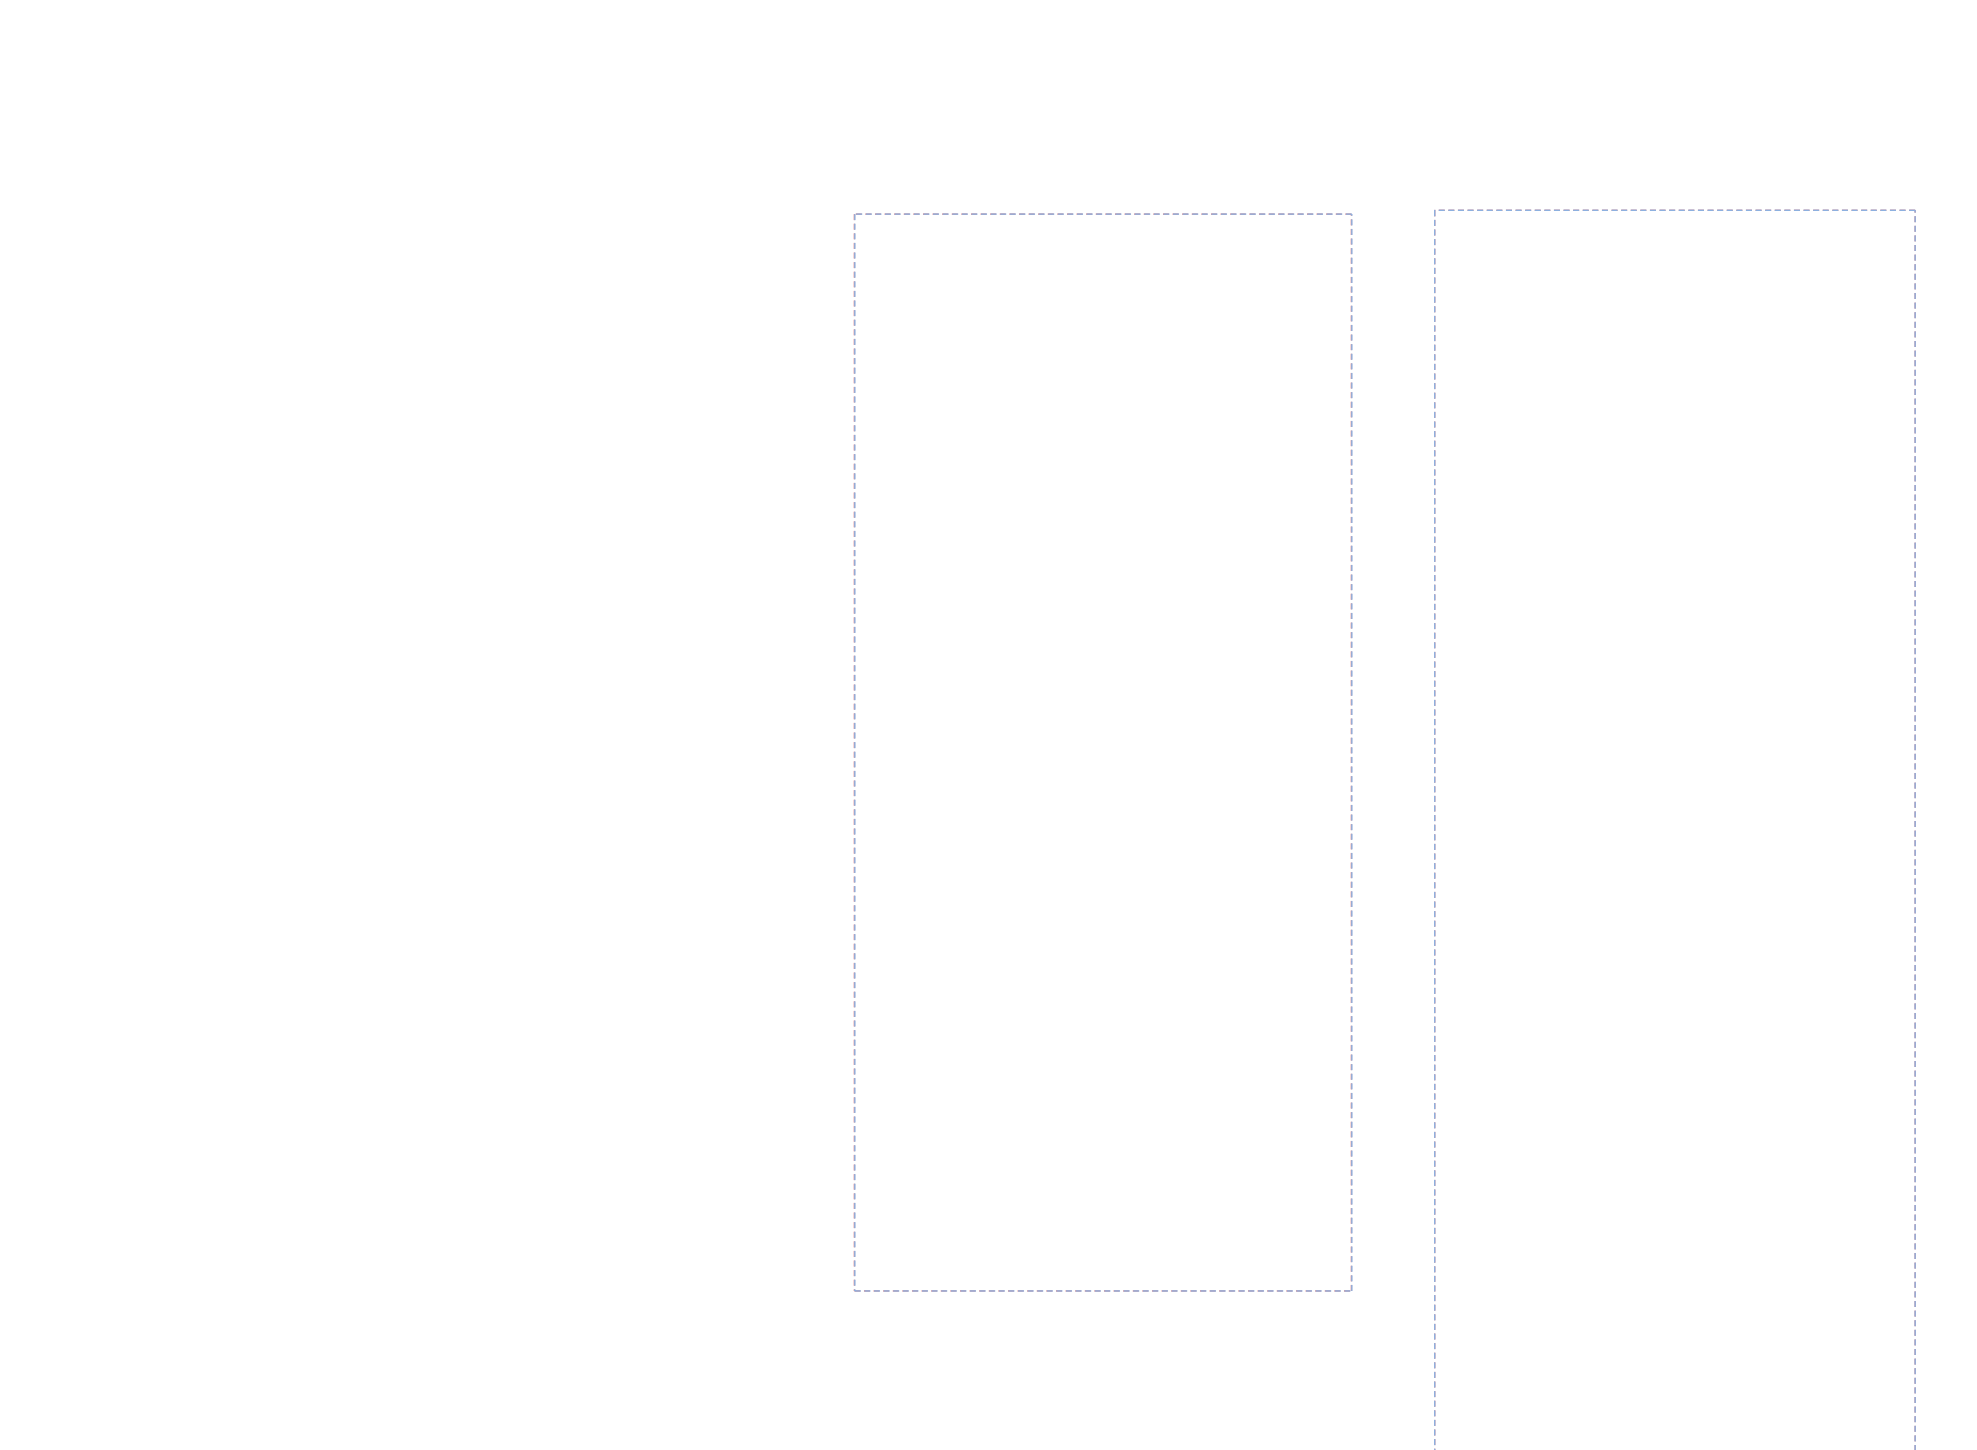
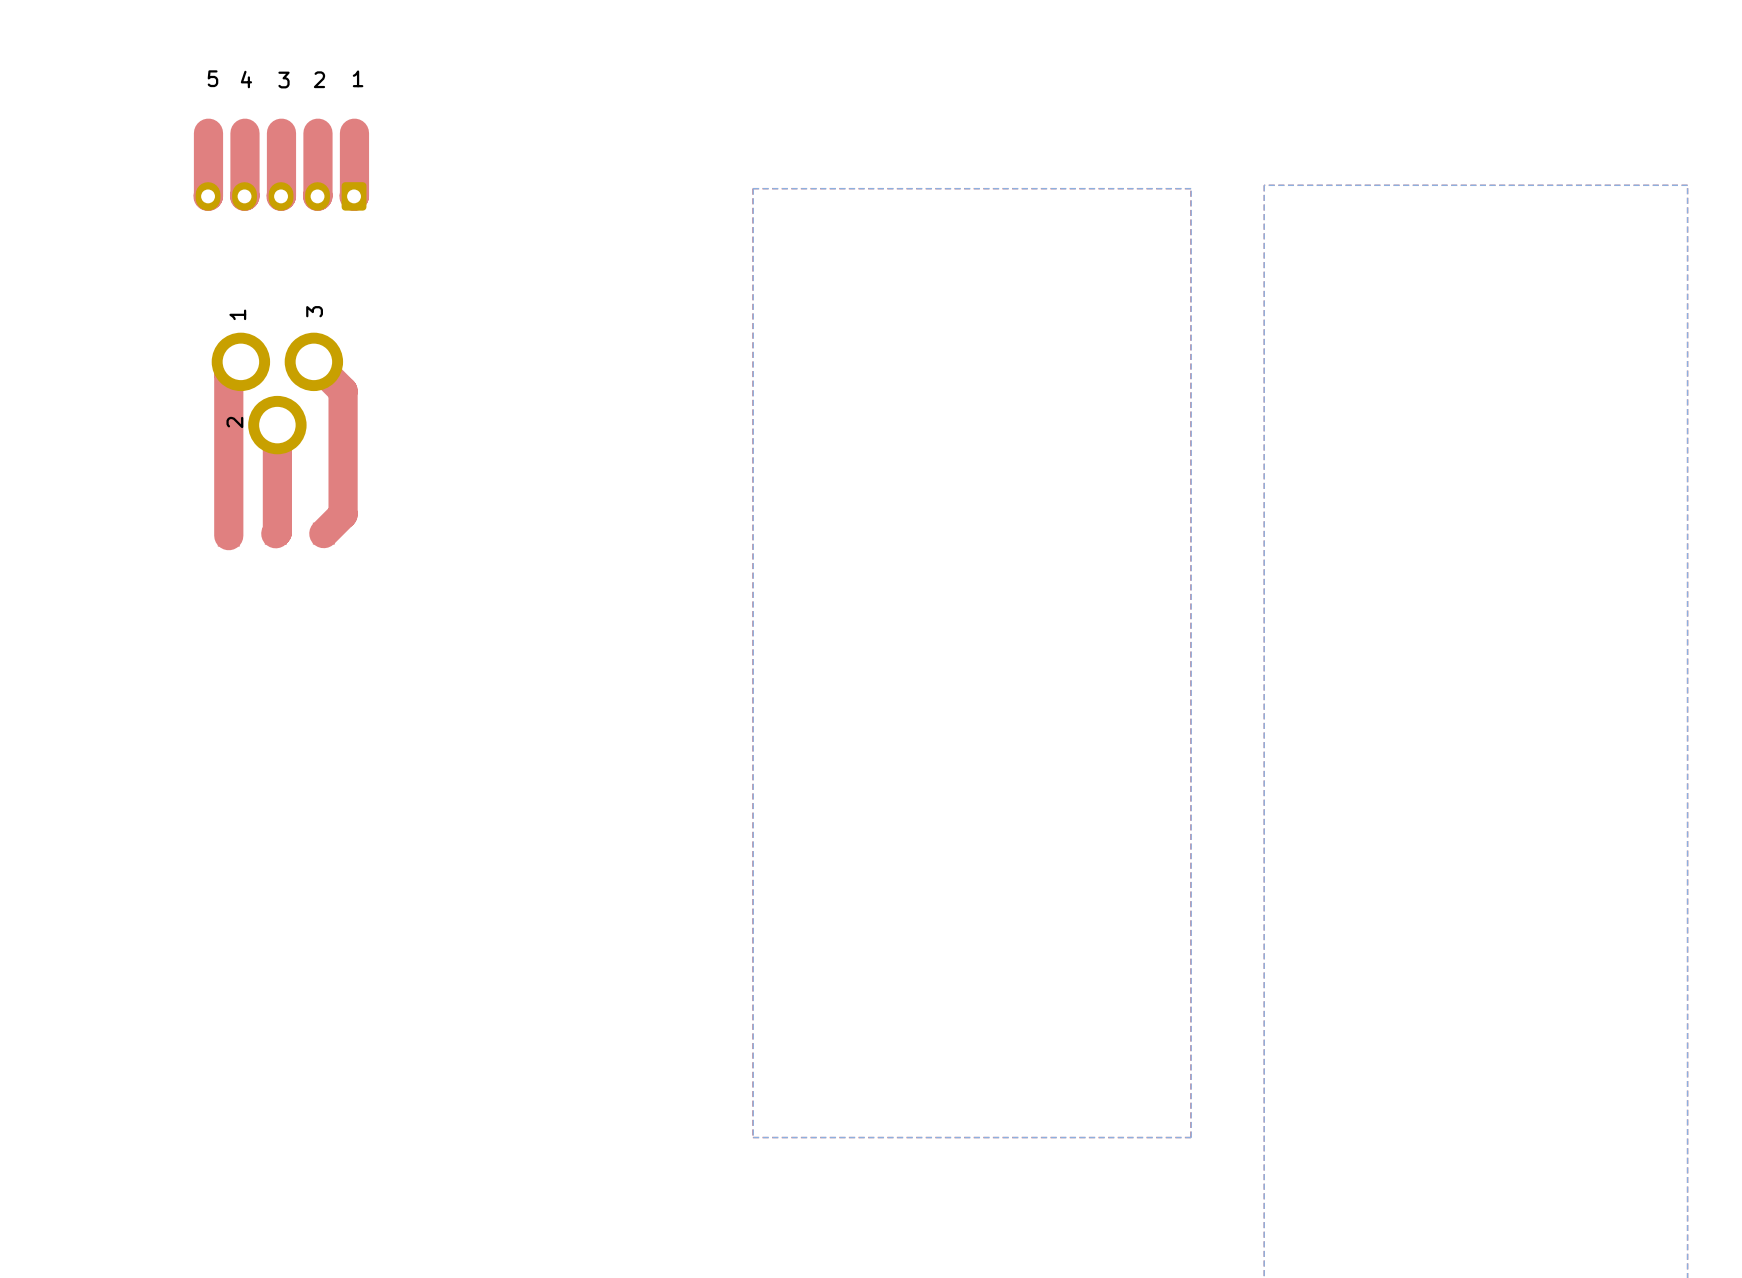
text: none -> 5 (212, 78)
text: none -> 1 (358, 78)
text: none -> 4 (246, 79)
text: none -> 3 (284, 80)
text: none -> 2 (319, 79)
top track: none -> (208, 133) (208, 196)
top track: none -> (244, 133) (244, 196)
top track: none -> (281, 133) (281, 196)
top track: none -> (317, 133) (317, 196)
top track: none -> (354, 133) (354, 196)
part: none -> (281, 196)
text: none -> 3 (314, 311)
text: none -> 1 (237, 314)
top track: none -> (240, 361) (228, 373) (228, 535)
top track: none -> (313, 361) (343, 391) (343, 514) (323, 533)
part: none -> (277, 393)
text: none -> 2 (234, 422)
top track: none -> (277, 425) (277, 532) (275, 533) (279, 537)

